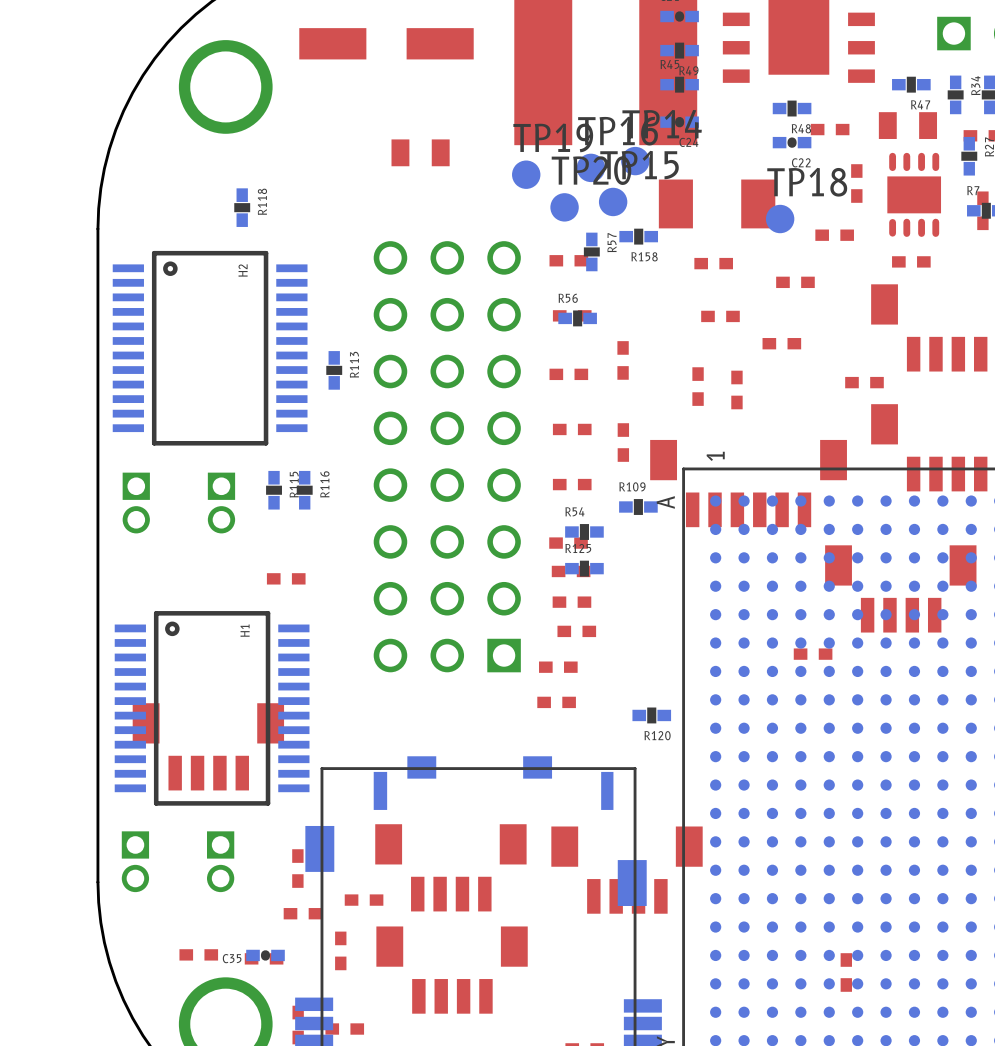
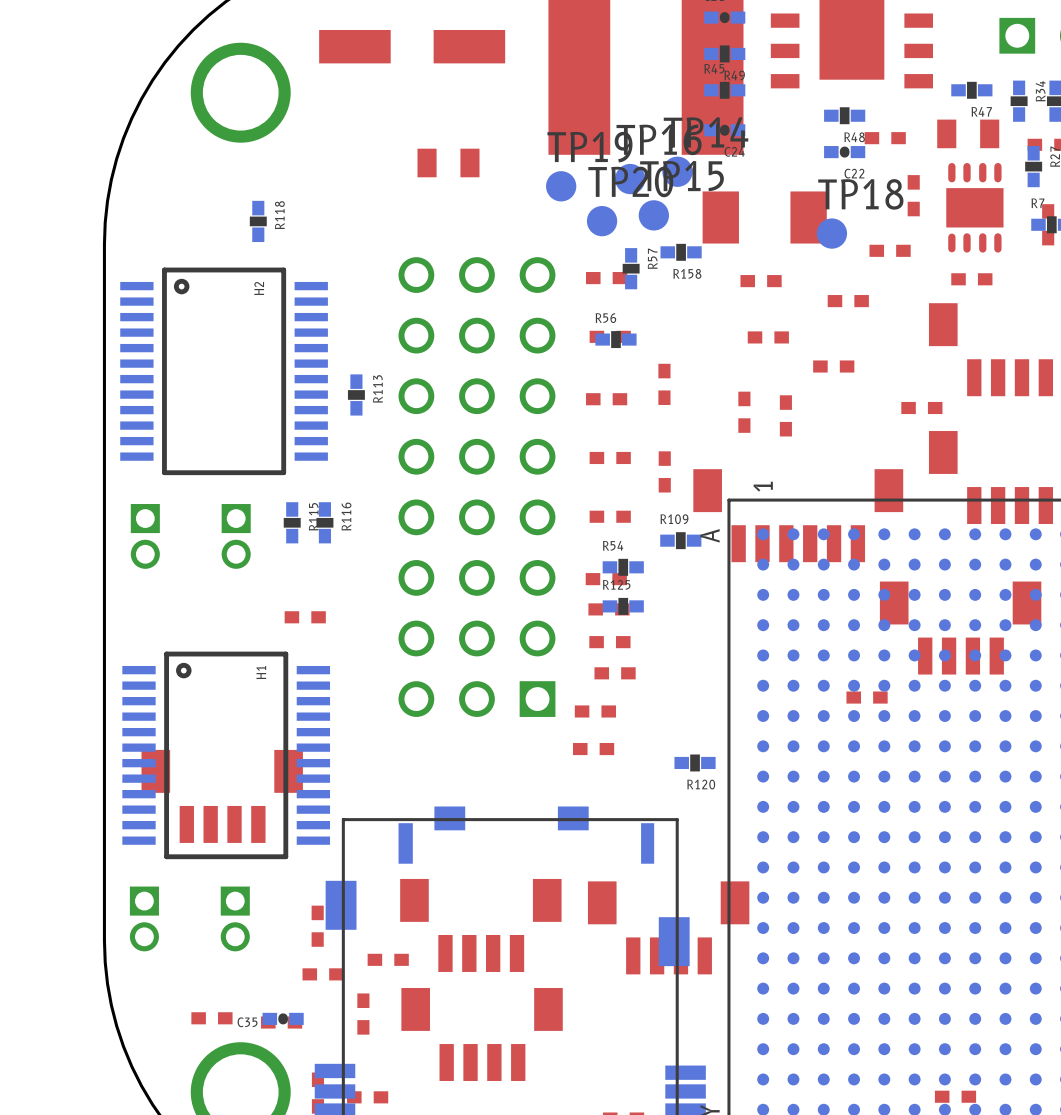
part: (846, 972) -> none
part: none -> (955, 1096)

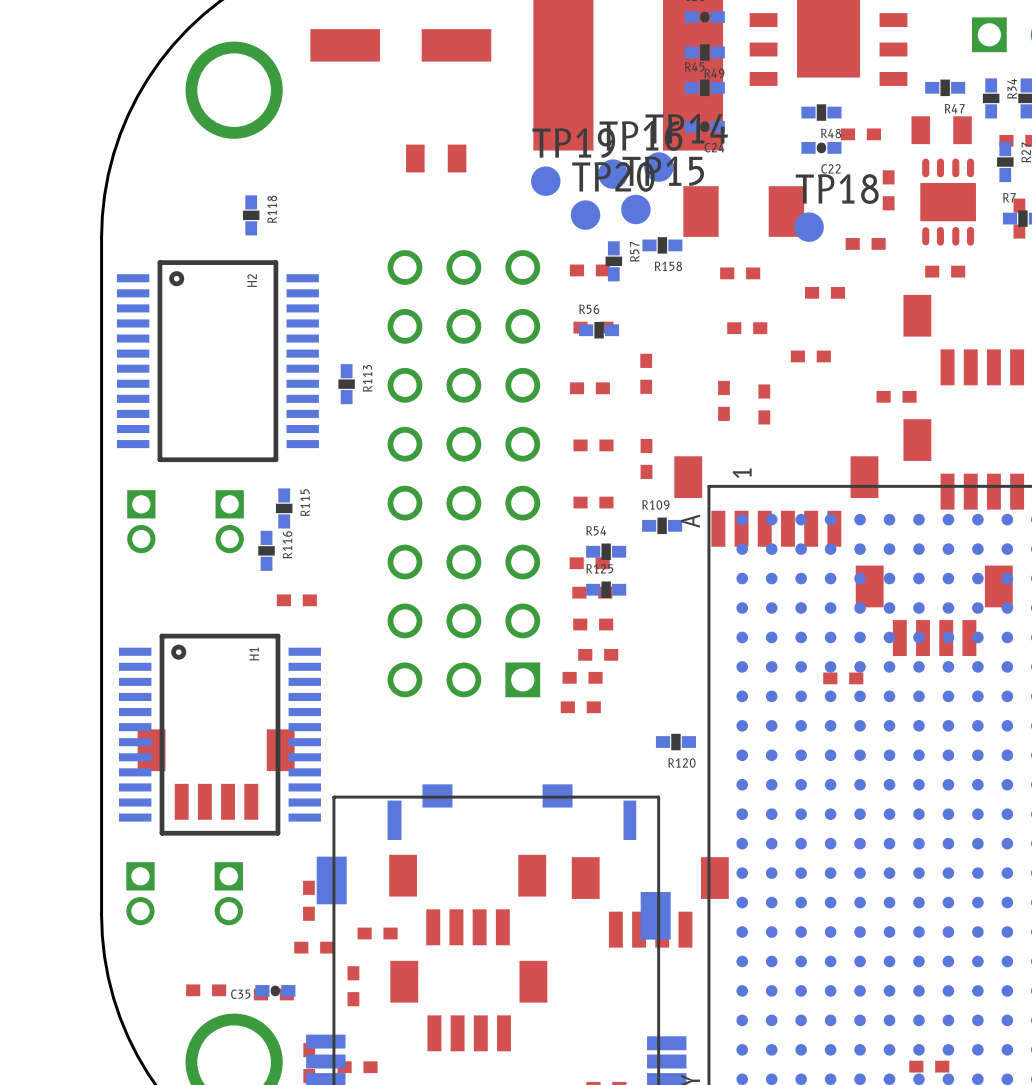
R116 position: (324, 522) -> (266, 550)
part: none -> (582, 677)
part: (595, 711) -> none
part: none -> (580, 707)
part: (593, 749) -> none

